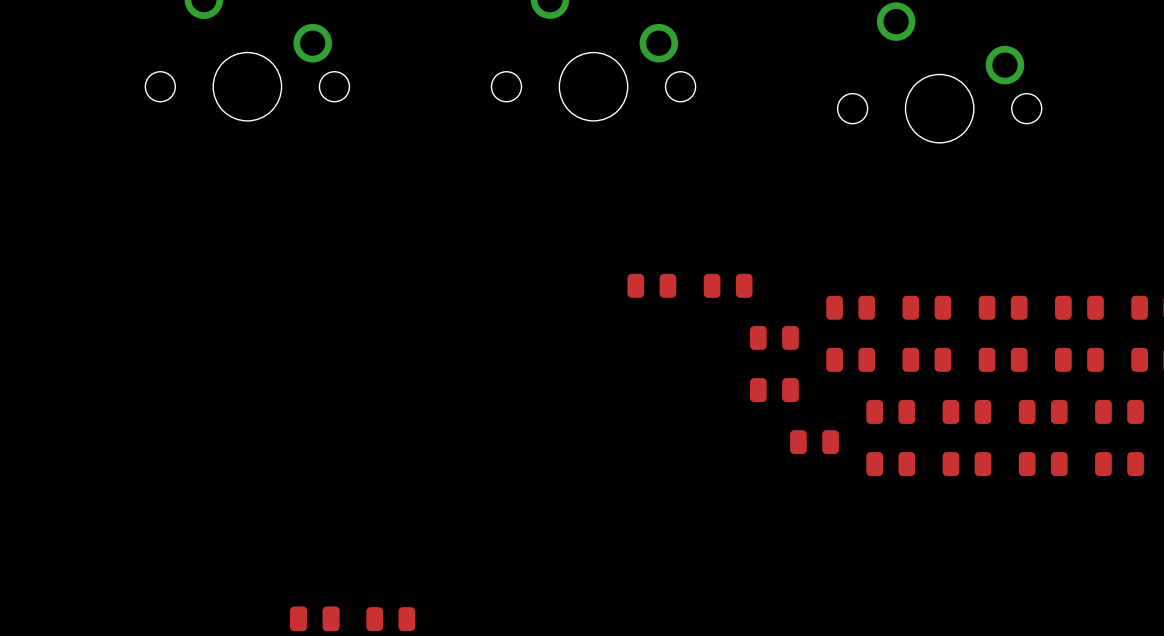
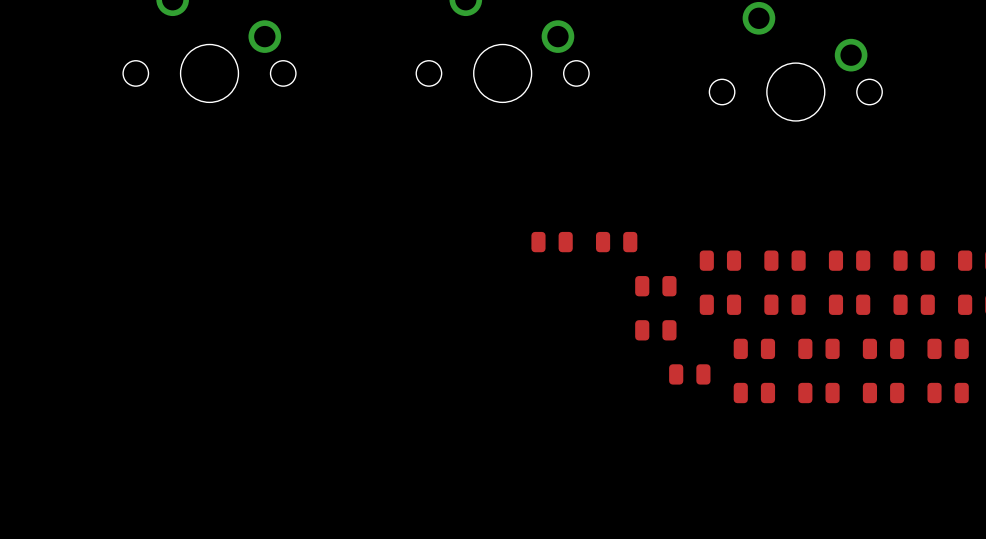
part: (314, 618) -> none
part: (390, 619) -> none

